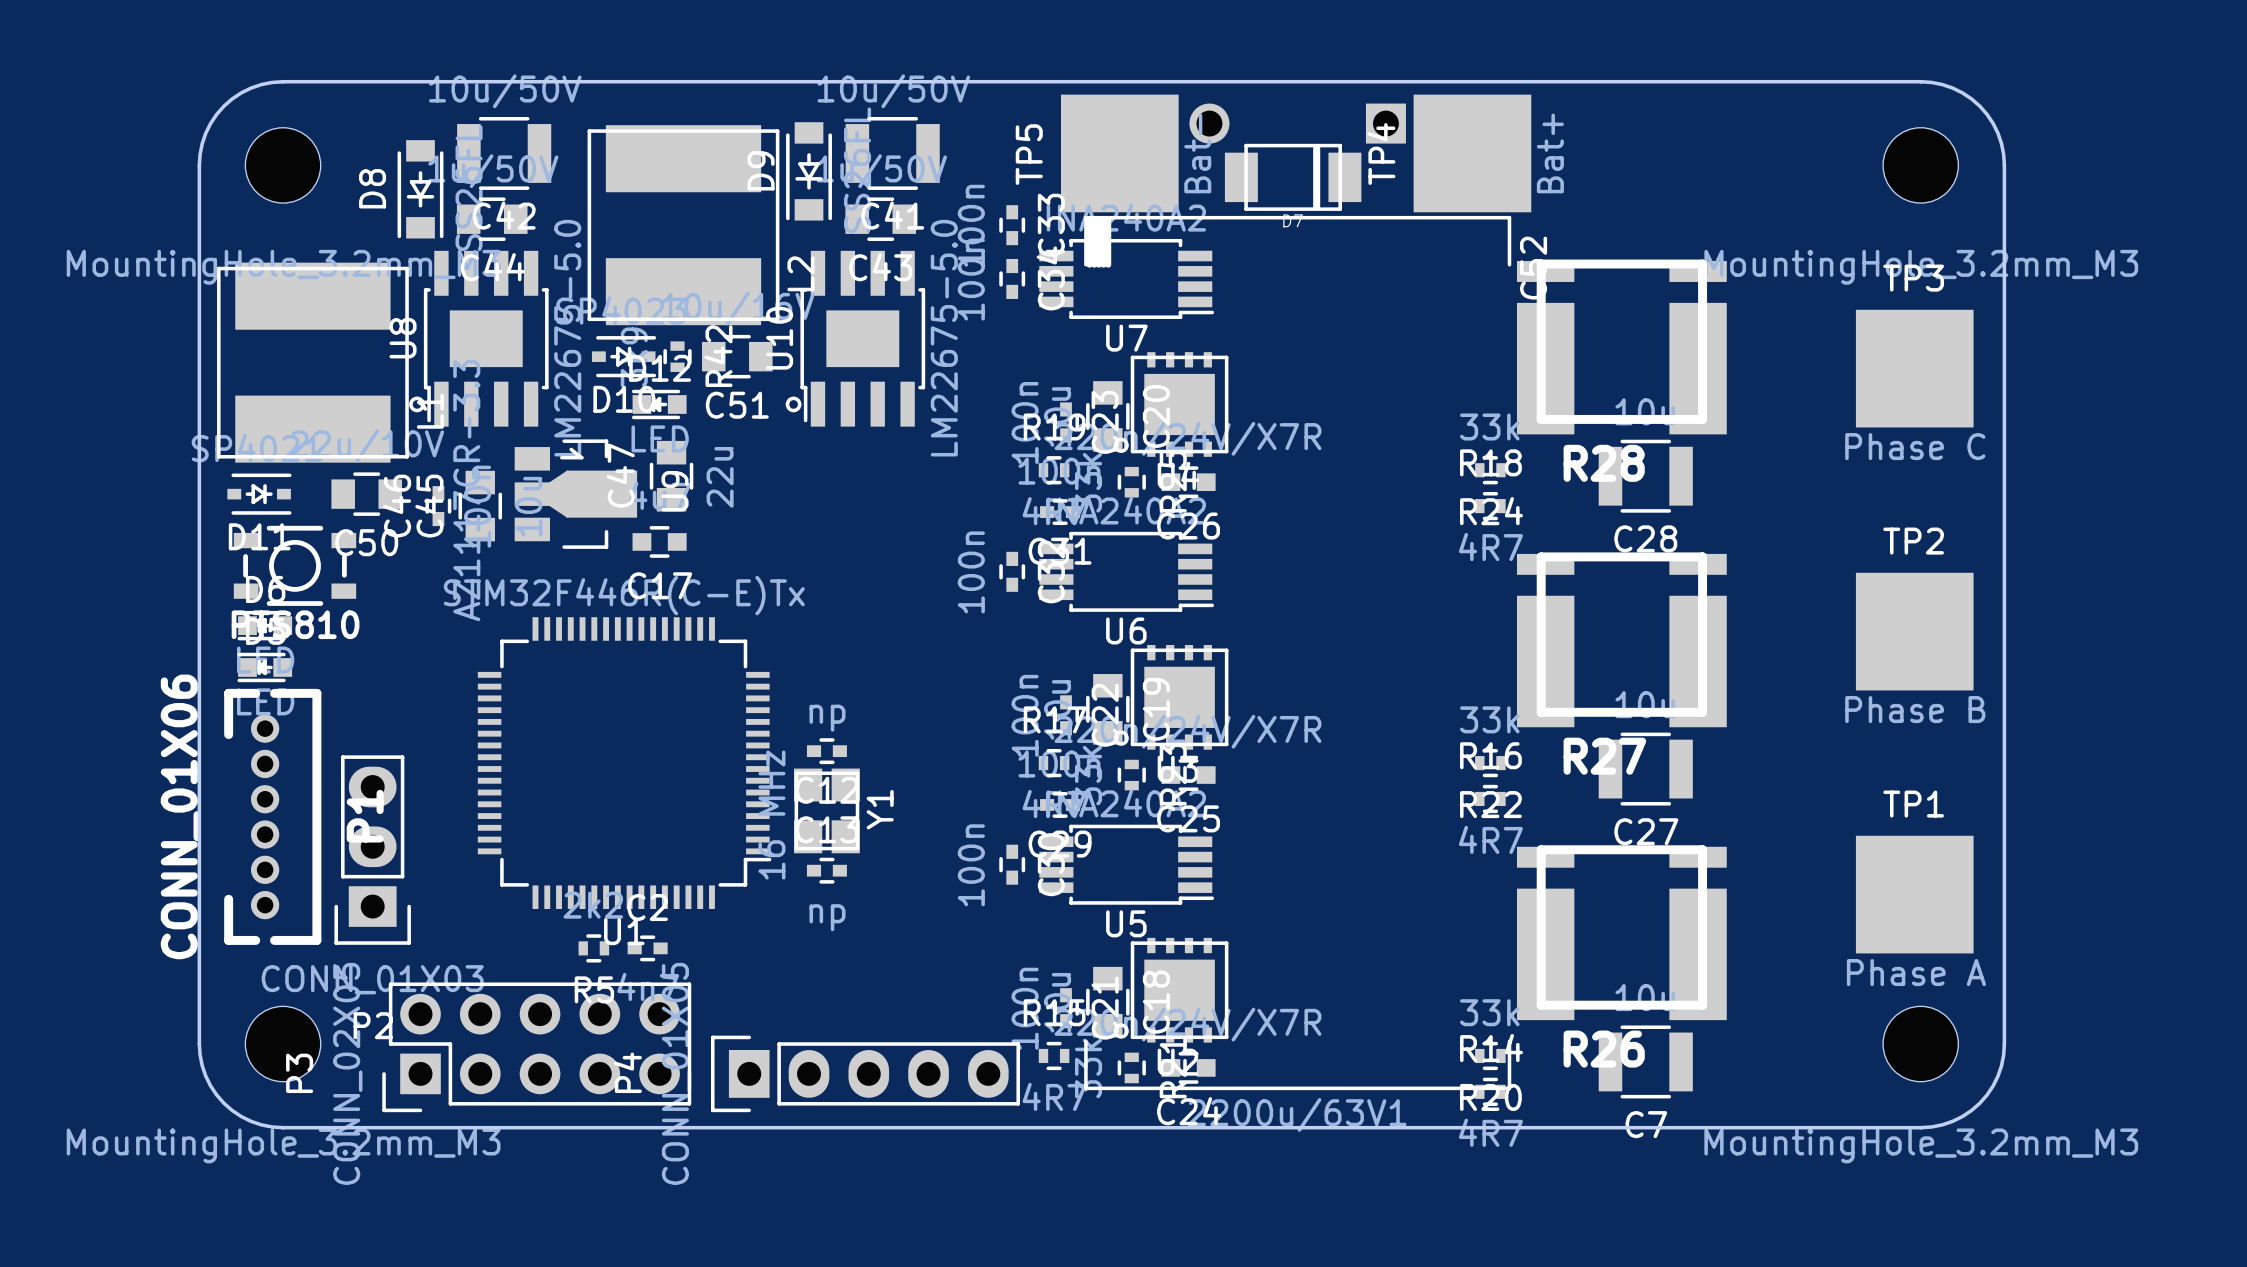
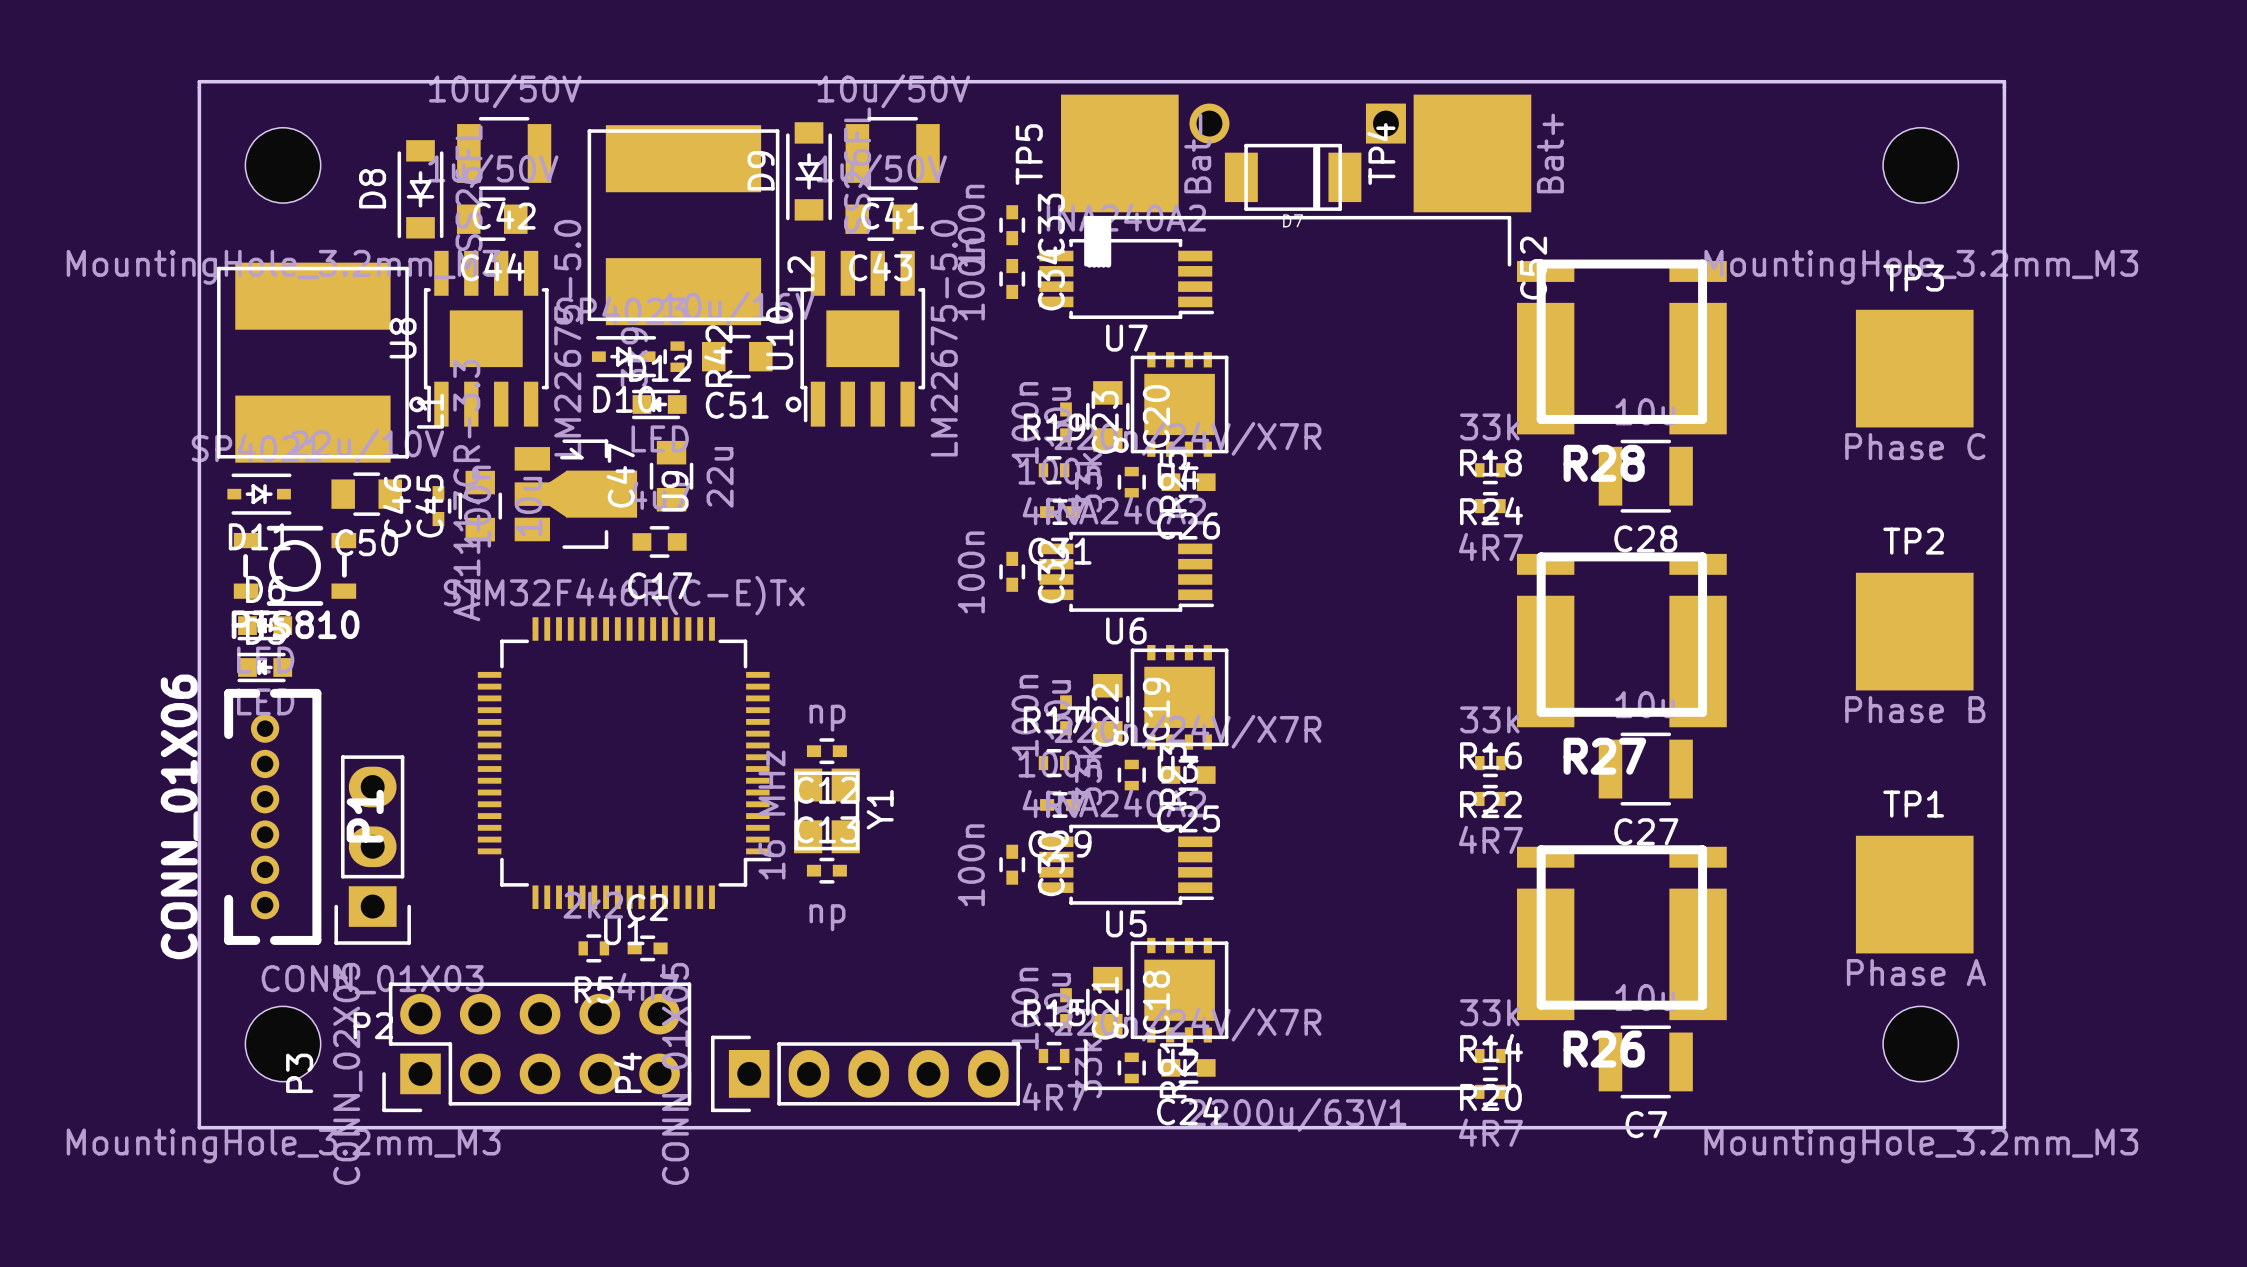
board edge: (283, 81) (251, 88) (223, 106) (205, 133) (199, 165) -> (283, 81) (199, 81) (199, 165)
board edge: (1920, 81) (1952, 88) (1979, 106) (1998, 133) (2004, 165) -> (1920, 81) (2004, 81) (2004, 165)
board edge: (199, 1044) (205, 1076) (223, 1103) (251, 1121) (283, 1127) -> (199, 1044) (199, 1127) (283, 1127)
board edge: (2004, 1044) (1998, 1076) (1979, 1103) (1952, 1121) (1920, 1127) -> (2004, 1044) (2004, 1127) (1920, 1127)

